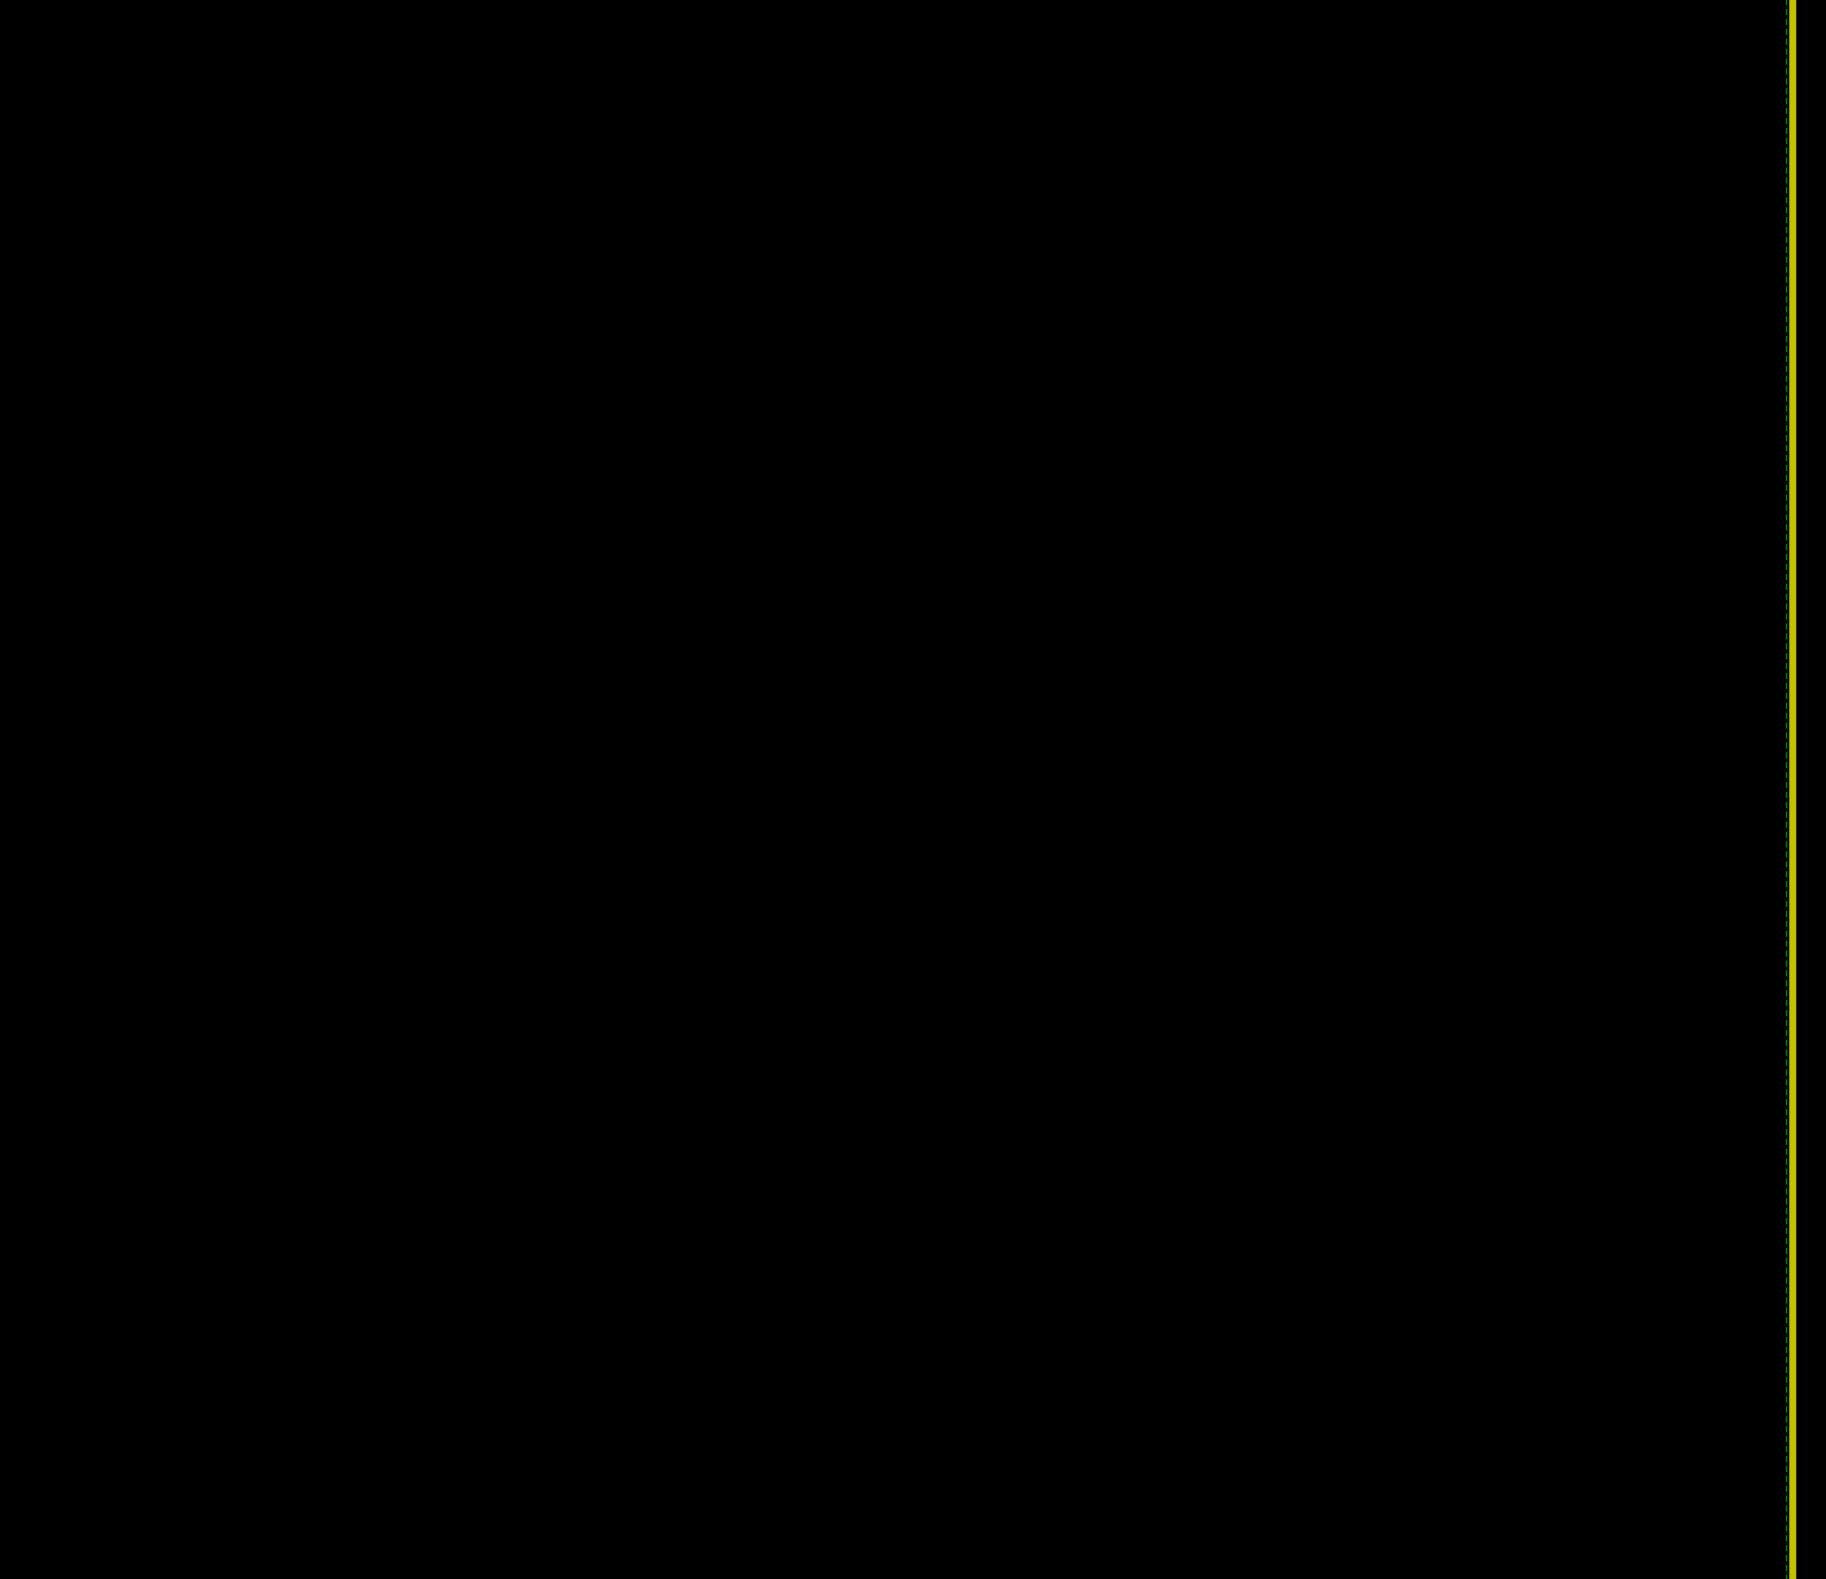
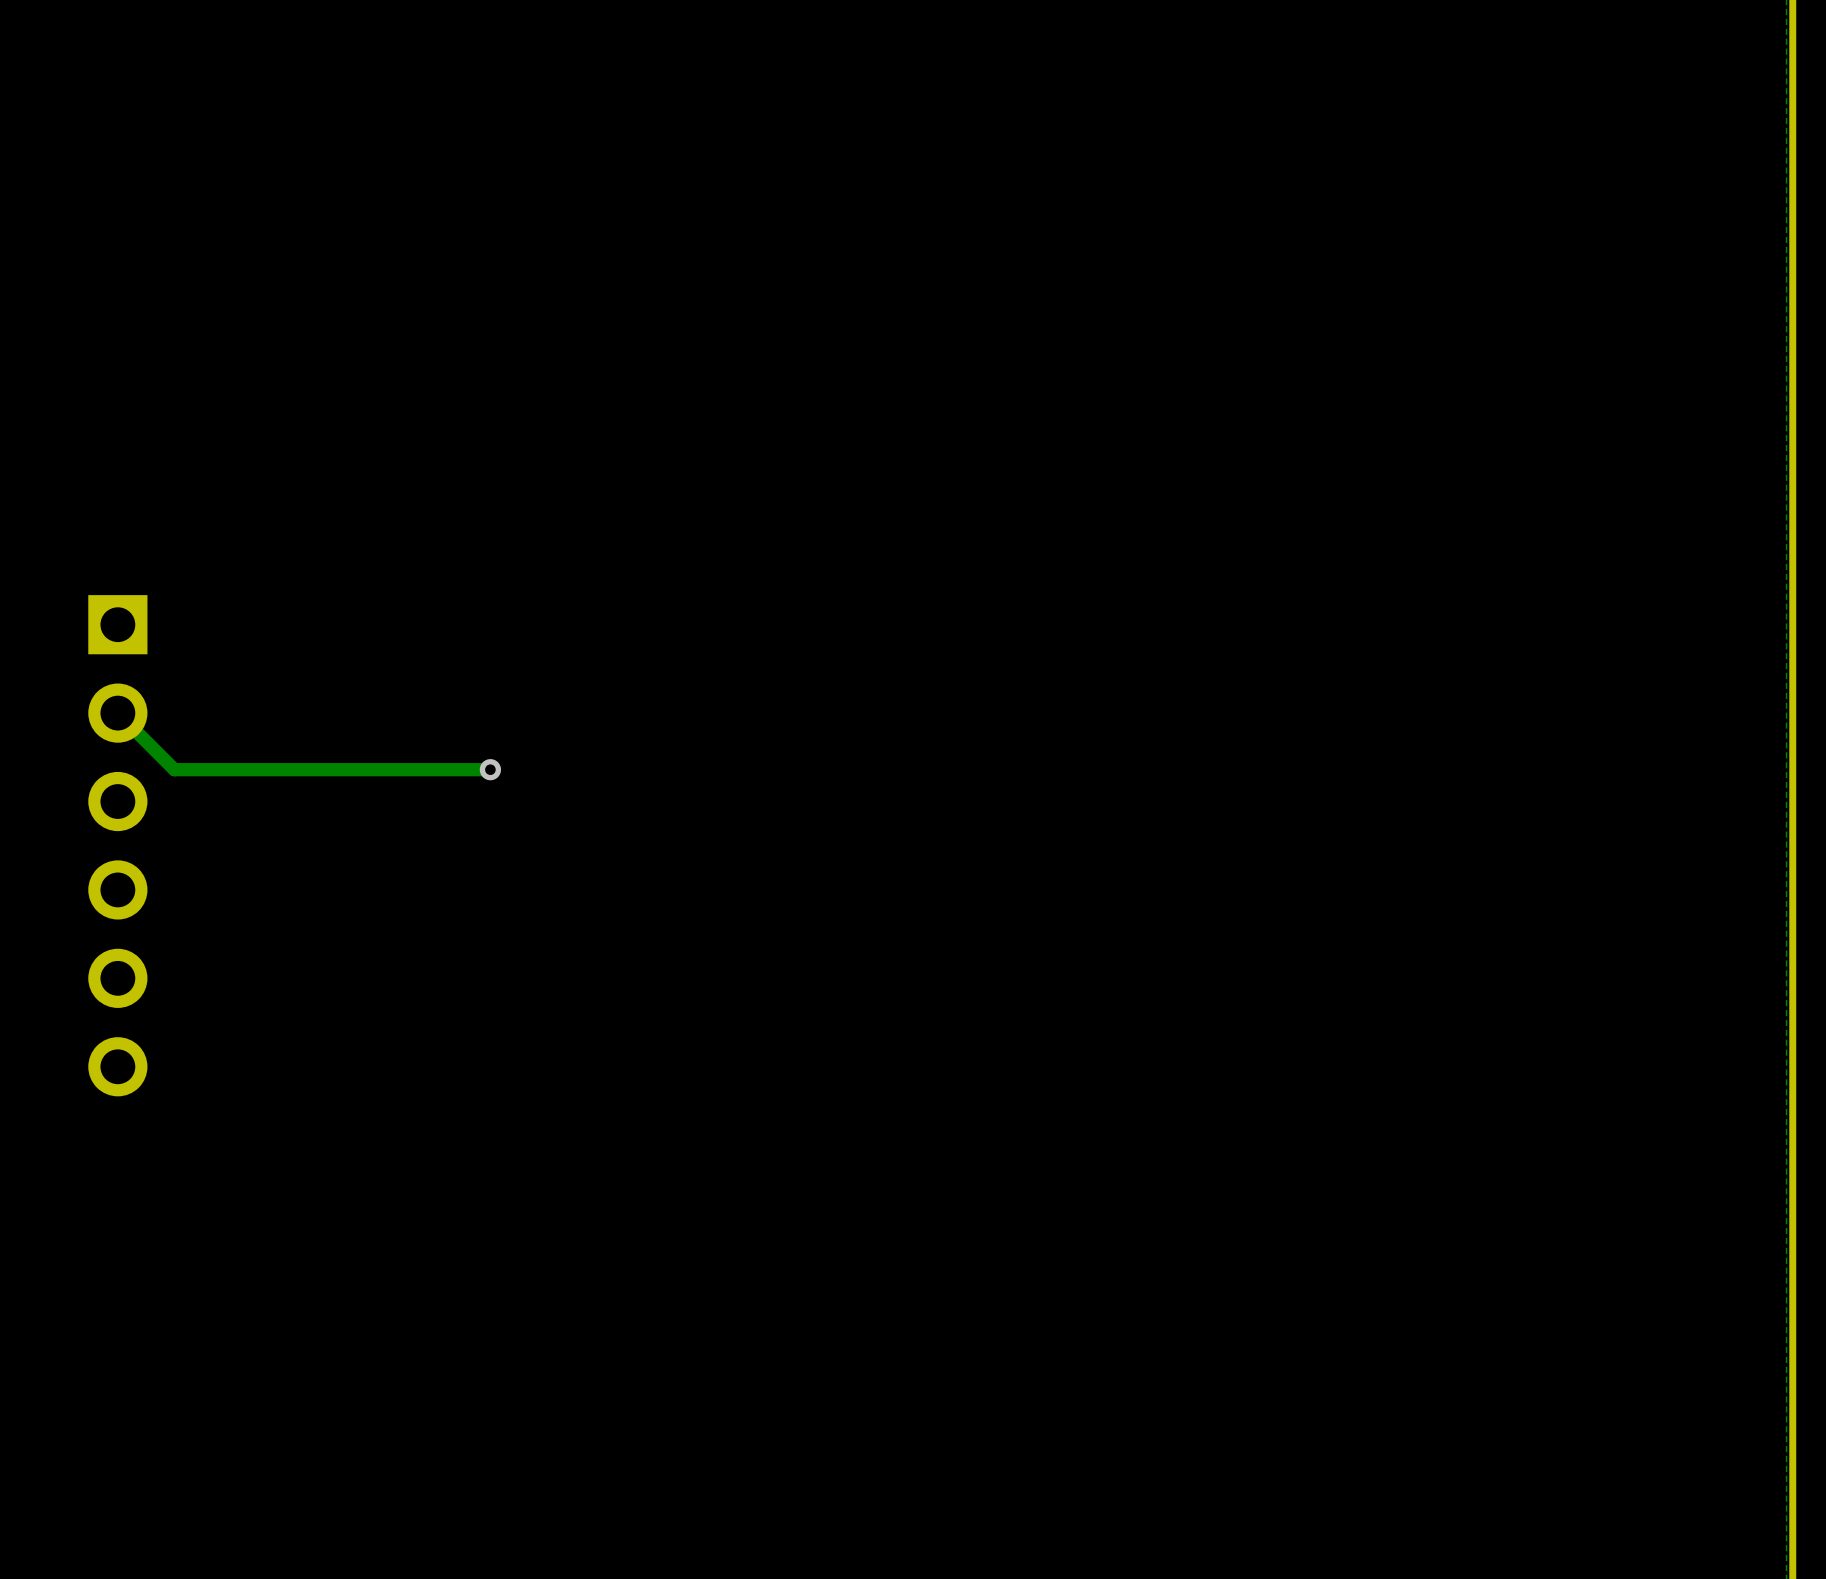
track: none -> (117, 713) (174, 769) (490, 769)
via: none -> (490, 769)
part: none -> (117, 845)

